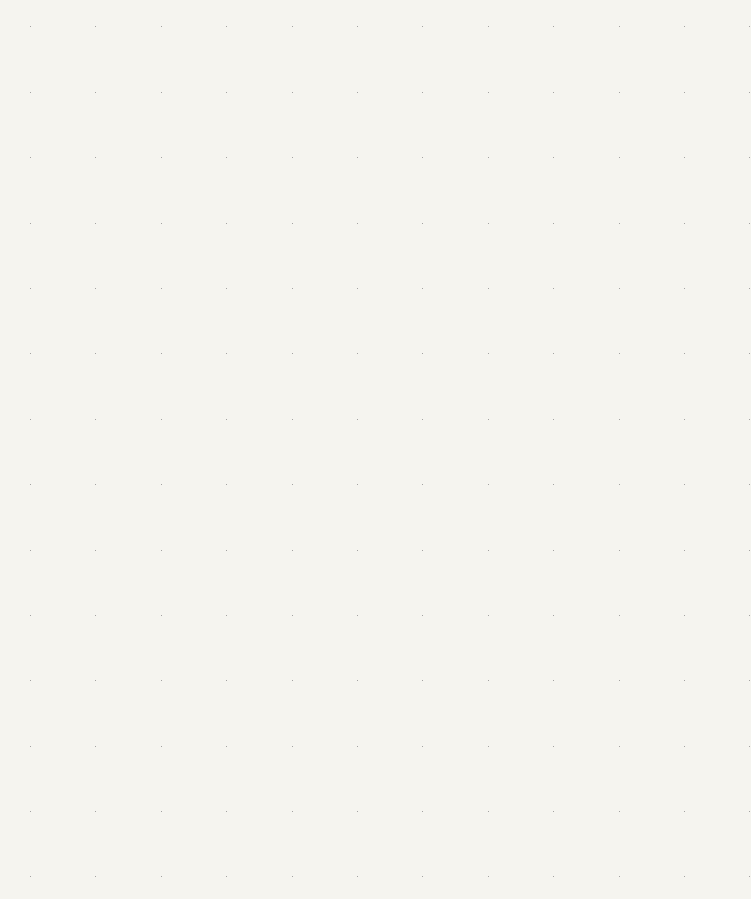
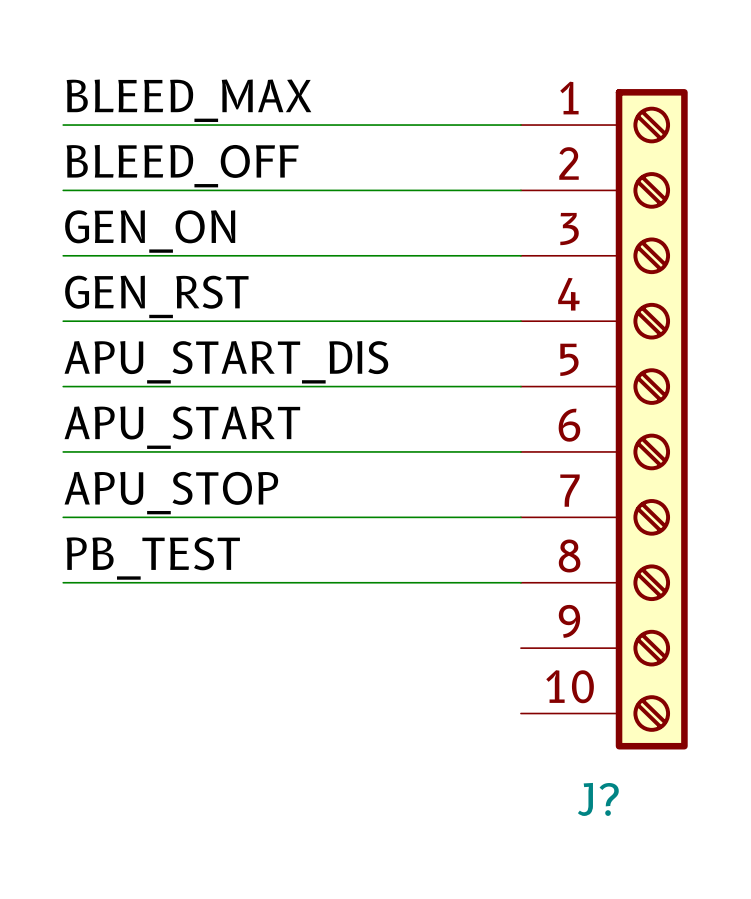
label: none -> BLEED_MAX (188, 100)
wire: none -> (63, 125) (520, 125)
label: none -> BLEED_OFF (182, 166)
wire: none -> (63, 190) (520, 190)
label: none -> GEN_ON (150, 231)
wire: none -> (63, 255) (520, 255)
label: none -> GEN_RST (156, 296)
wire: none -> (63, 321) (520, 321)
label: none -> APU_START_DIS (226, 362)
wire: none -> (63, 386) (520, 386)
J?: none -> (604, 419)
label: none -> APU_START (182, 427)
wire: none -> (63, 451) (520, 451)
label: none -> APU_STOP (171, 493)
wire: none -> (63, 517) (520, 517)
label: none -> PB_TEST (153, 558)
wire: none -> (63, 582) (520, 582)

